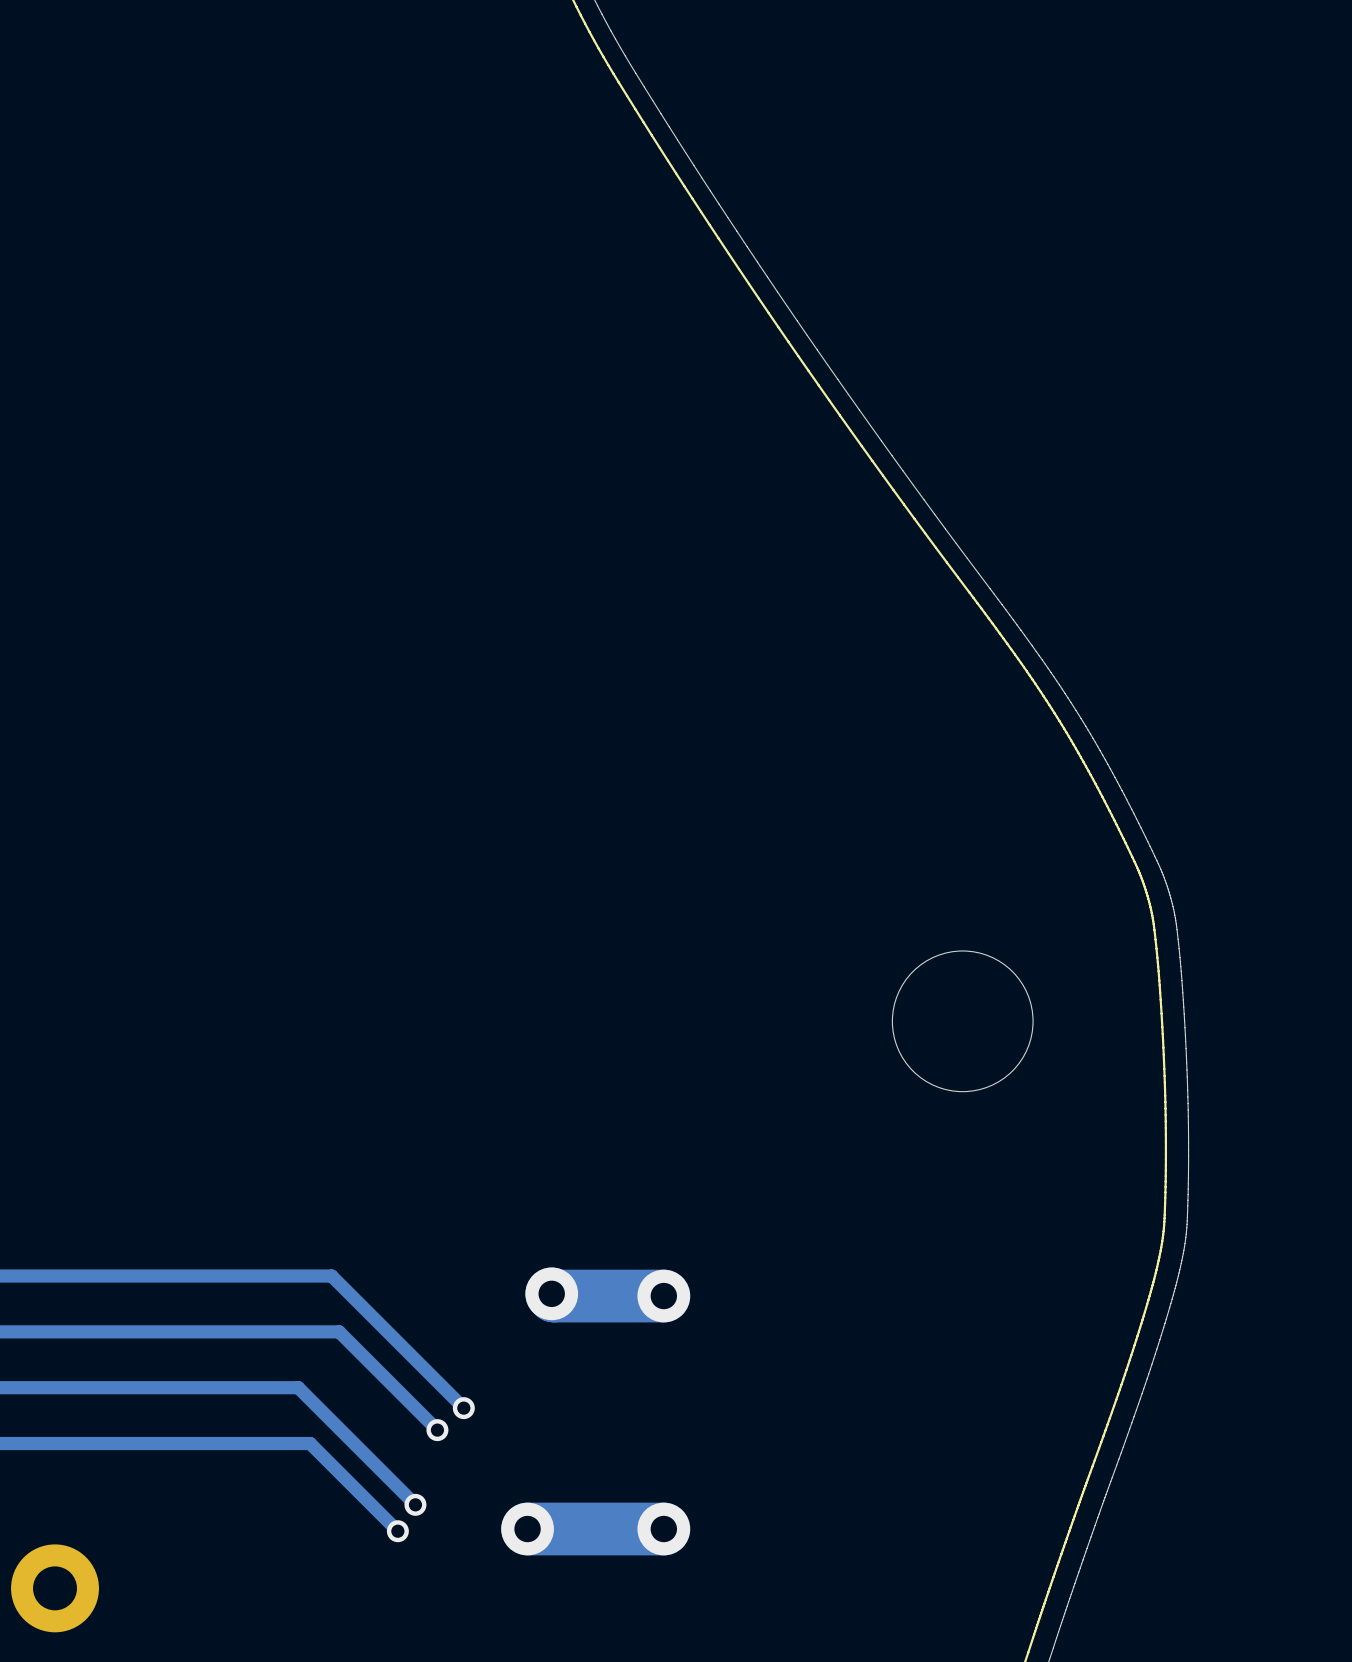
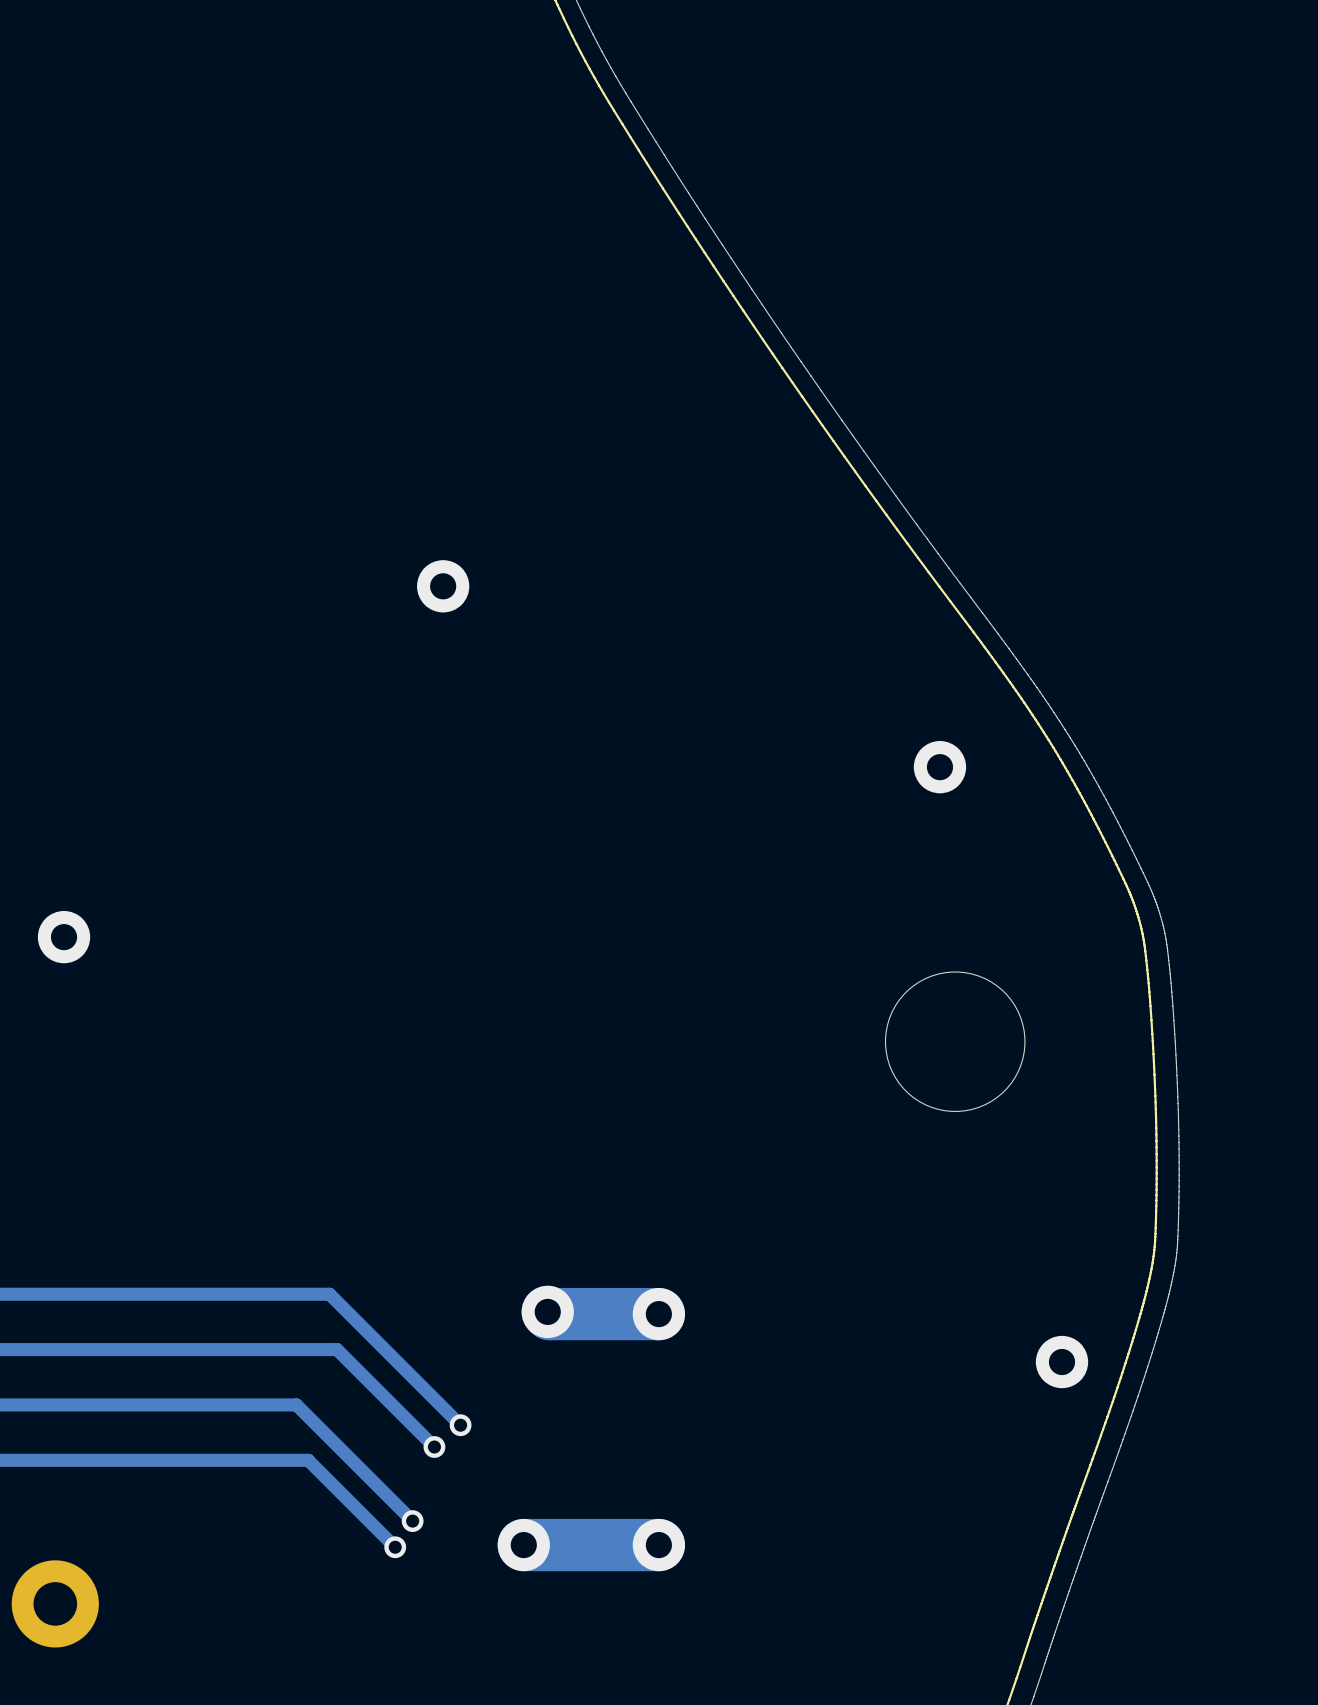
via: none -> (443, 586)
via: none -> (939, 767)
via: none -> (64, 937)
via: none -> (1062, 1362)

